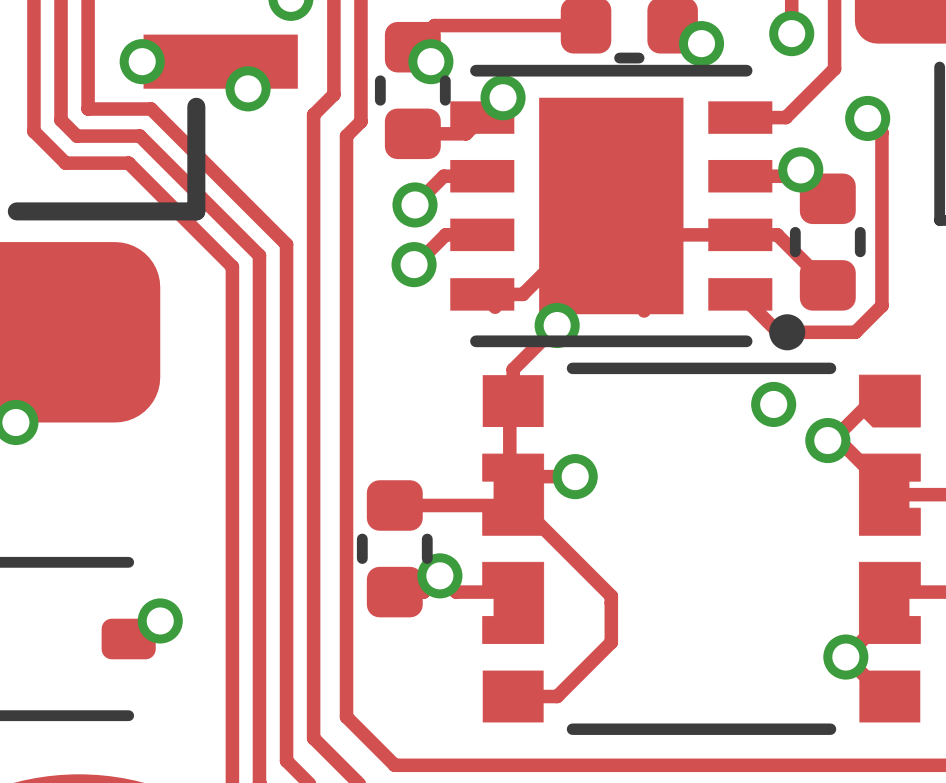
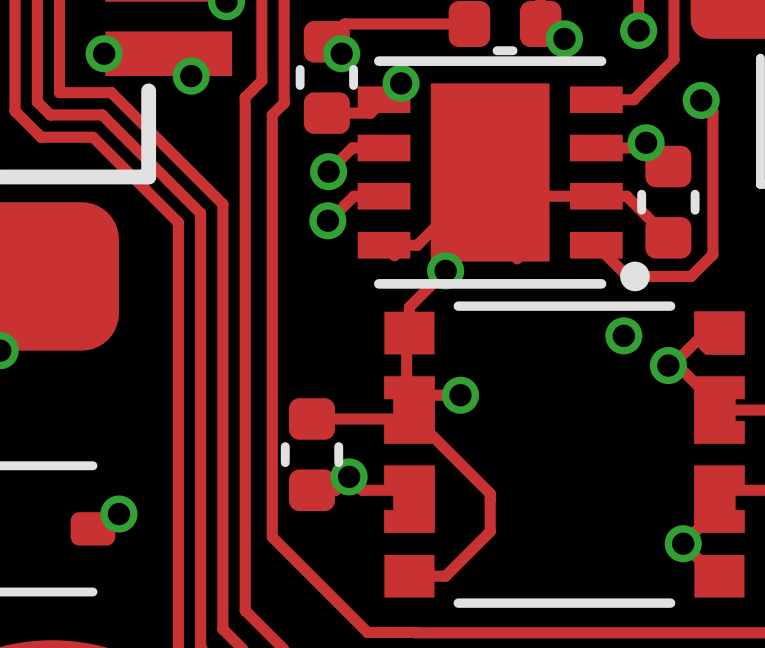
track: (346, 649) (346, 717) (394, 765) (520, 765) -> (272, 537) (367, 632) (415, 632)

